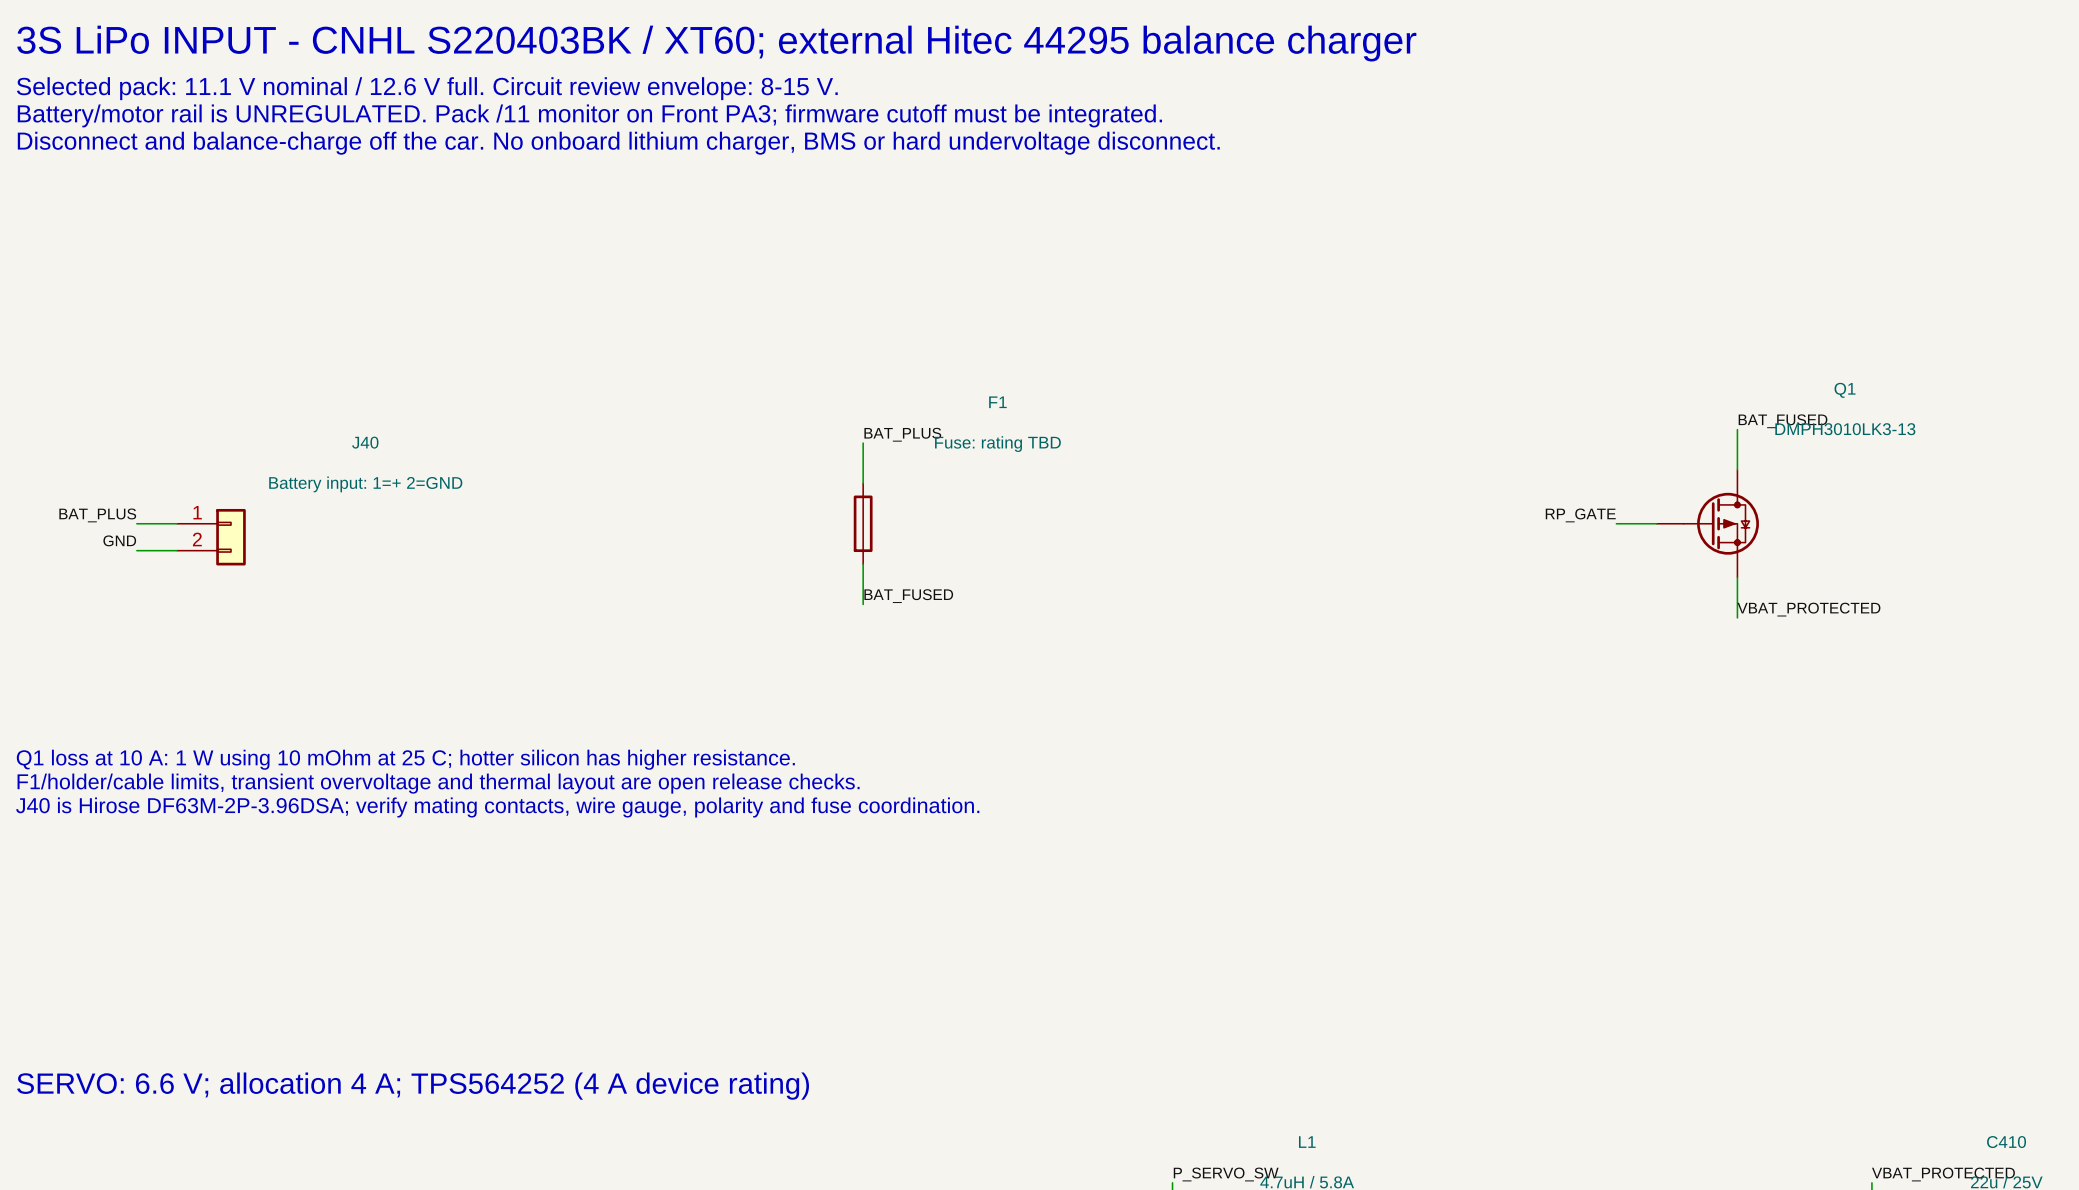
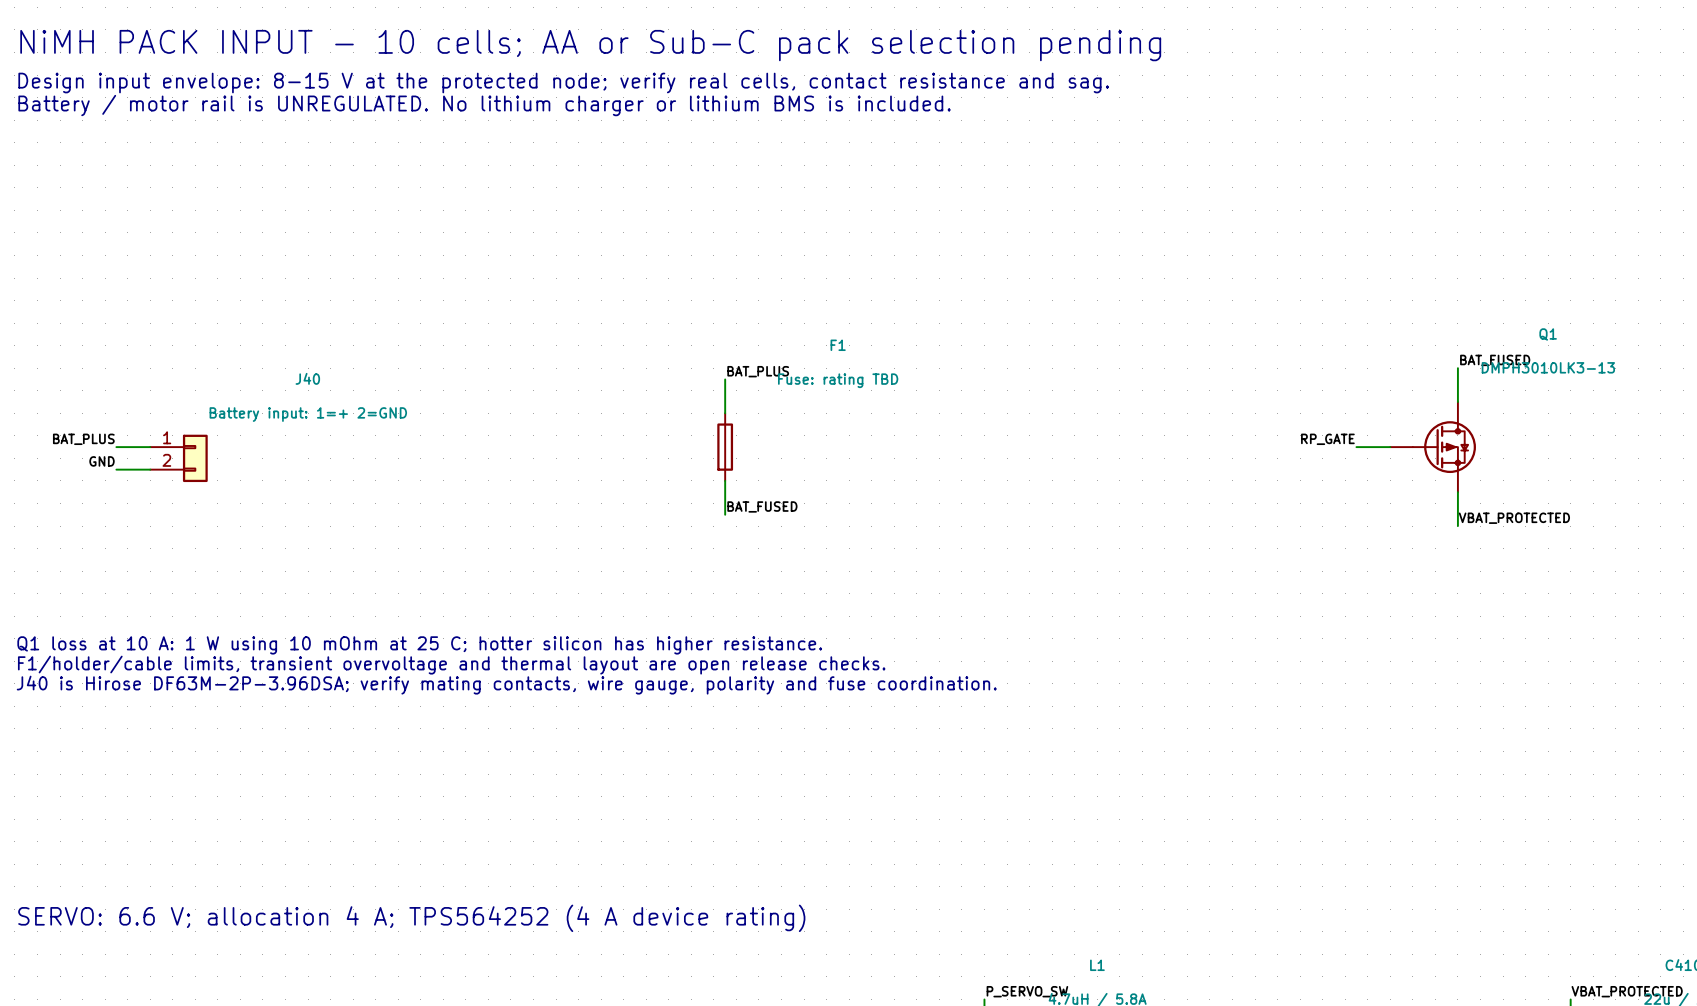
text: 3S LiPo INPUT - CNHL S220403BK / XT60; external Hitec 44295 balance charger (716, 43) -> NiMH PACK INPUT - 10 cells; AA or Sub-C pack selection pending (590, 45)
text: Selected pack: 11.1 V nominal / 12.6 V full. Circuit review envelope: 8-15 V. (427, 88) -> Design input envelope: 8-15 V at the protected node; verify real cells, contact resistance and sag. (563, 83)
text: Battery/motor rail is UNREGULATED. Pack /11 monitor on Front PA3; firmware cutoff must be integrated. (589, 115) -> Battery / motor rail is UNREGULATED. No lithium charger or lithium BMS is included. (484, 105)
text: Disconnect and balance-charge off the car. No onboard lithium charger, BMS or hard undervoltage disconnect. (618, 143) -> none

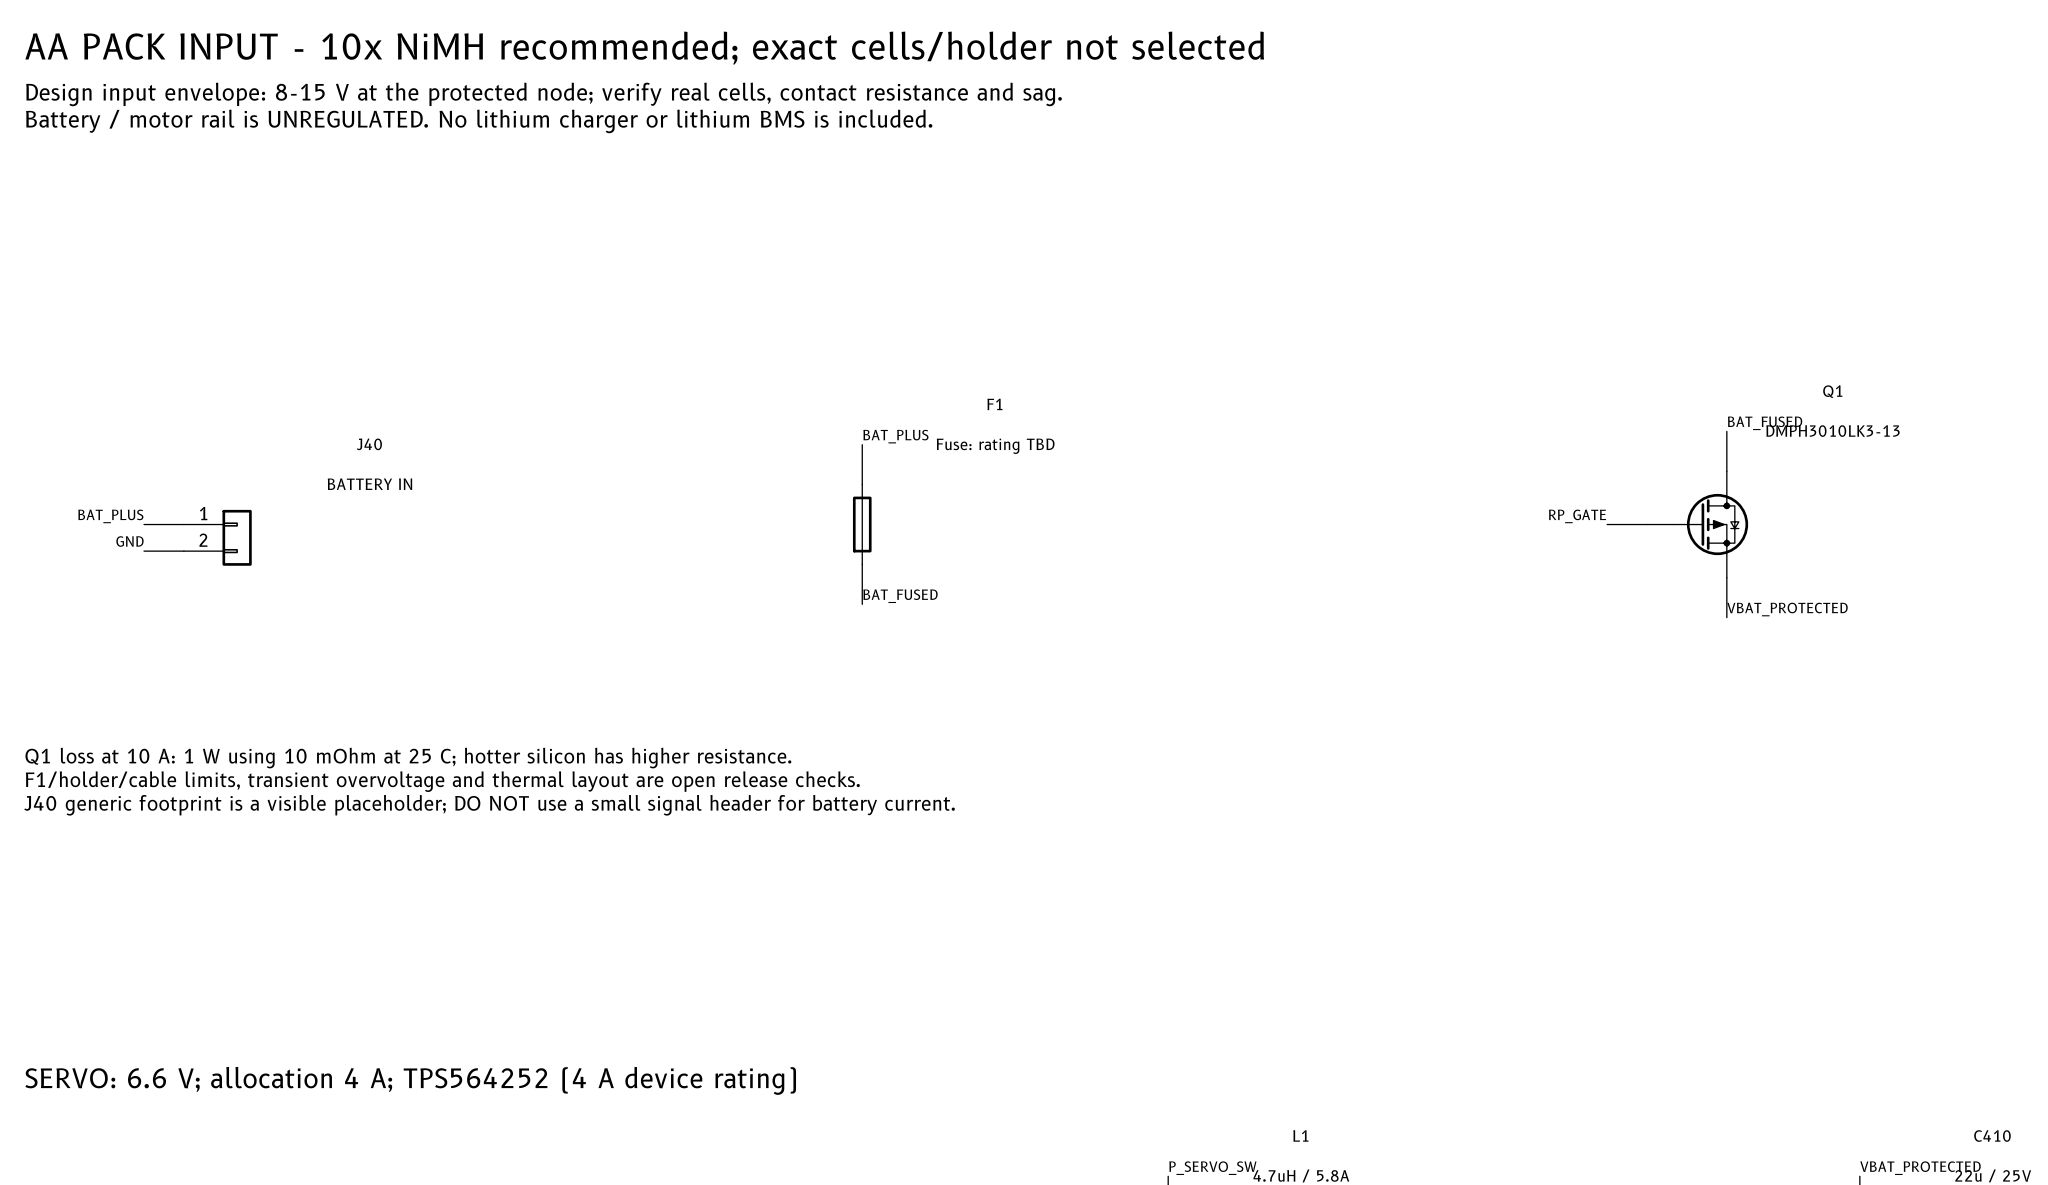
text: NiMH PACK INPUT - 10 cells; AA or Sub-C pack selection pending (590, 45) -> AA PACK INPUT - 10x NiMH recommended; exact cells/holder not selected (644, 48)
J40 value: Battery input: 1=+ 2=GND (308, 414) -> BATTERY IN (369, 484)
text: J40 is Hirose DF63M-2P-3.96DSA; verify mating contacts, wire gauge, polarity and fuse coordination. (506, 685) -> J40 generic footprint is a visible placeholder; DO NOT use a small signal header for battery current. (489, 805)

